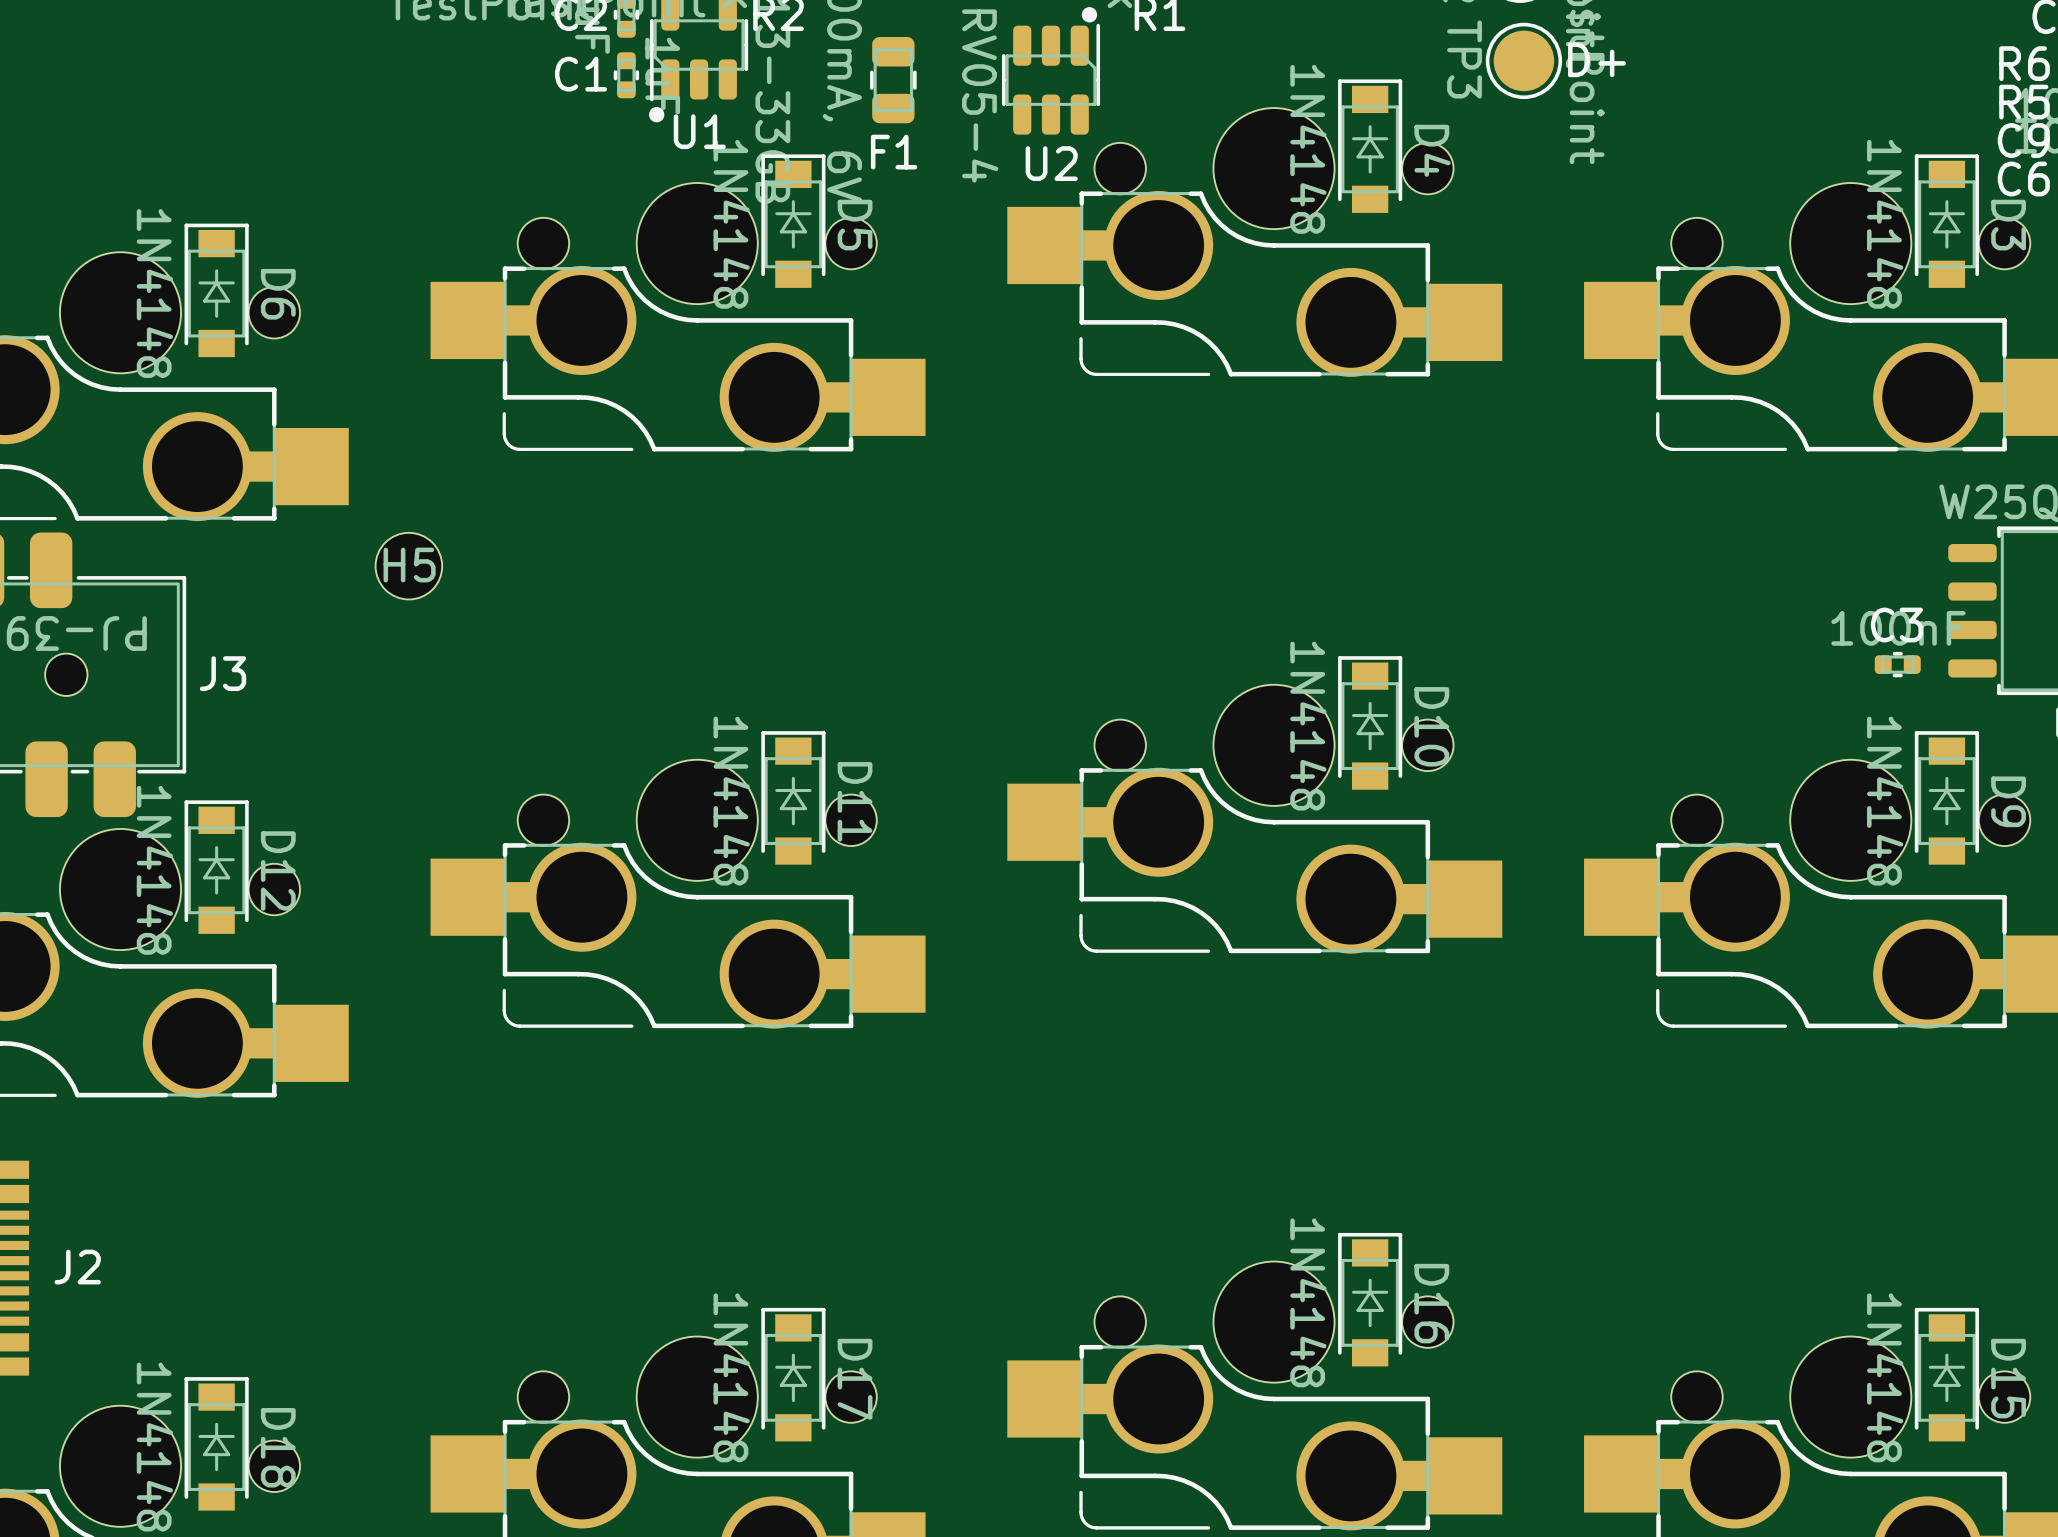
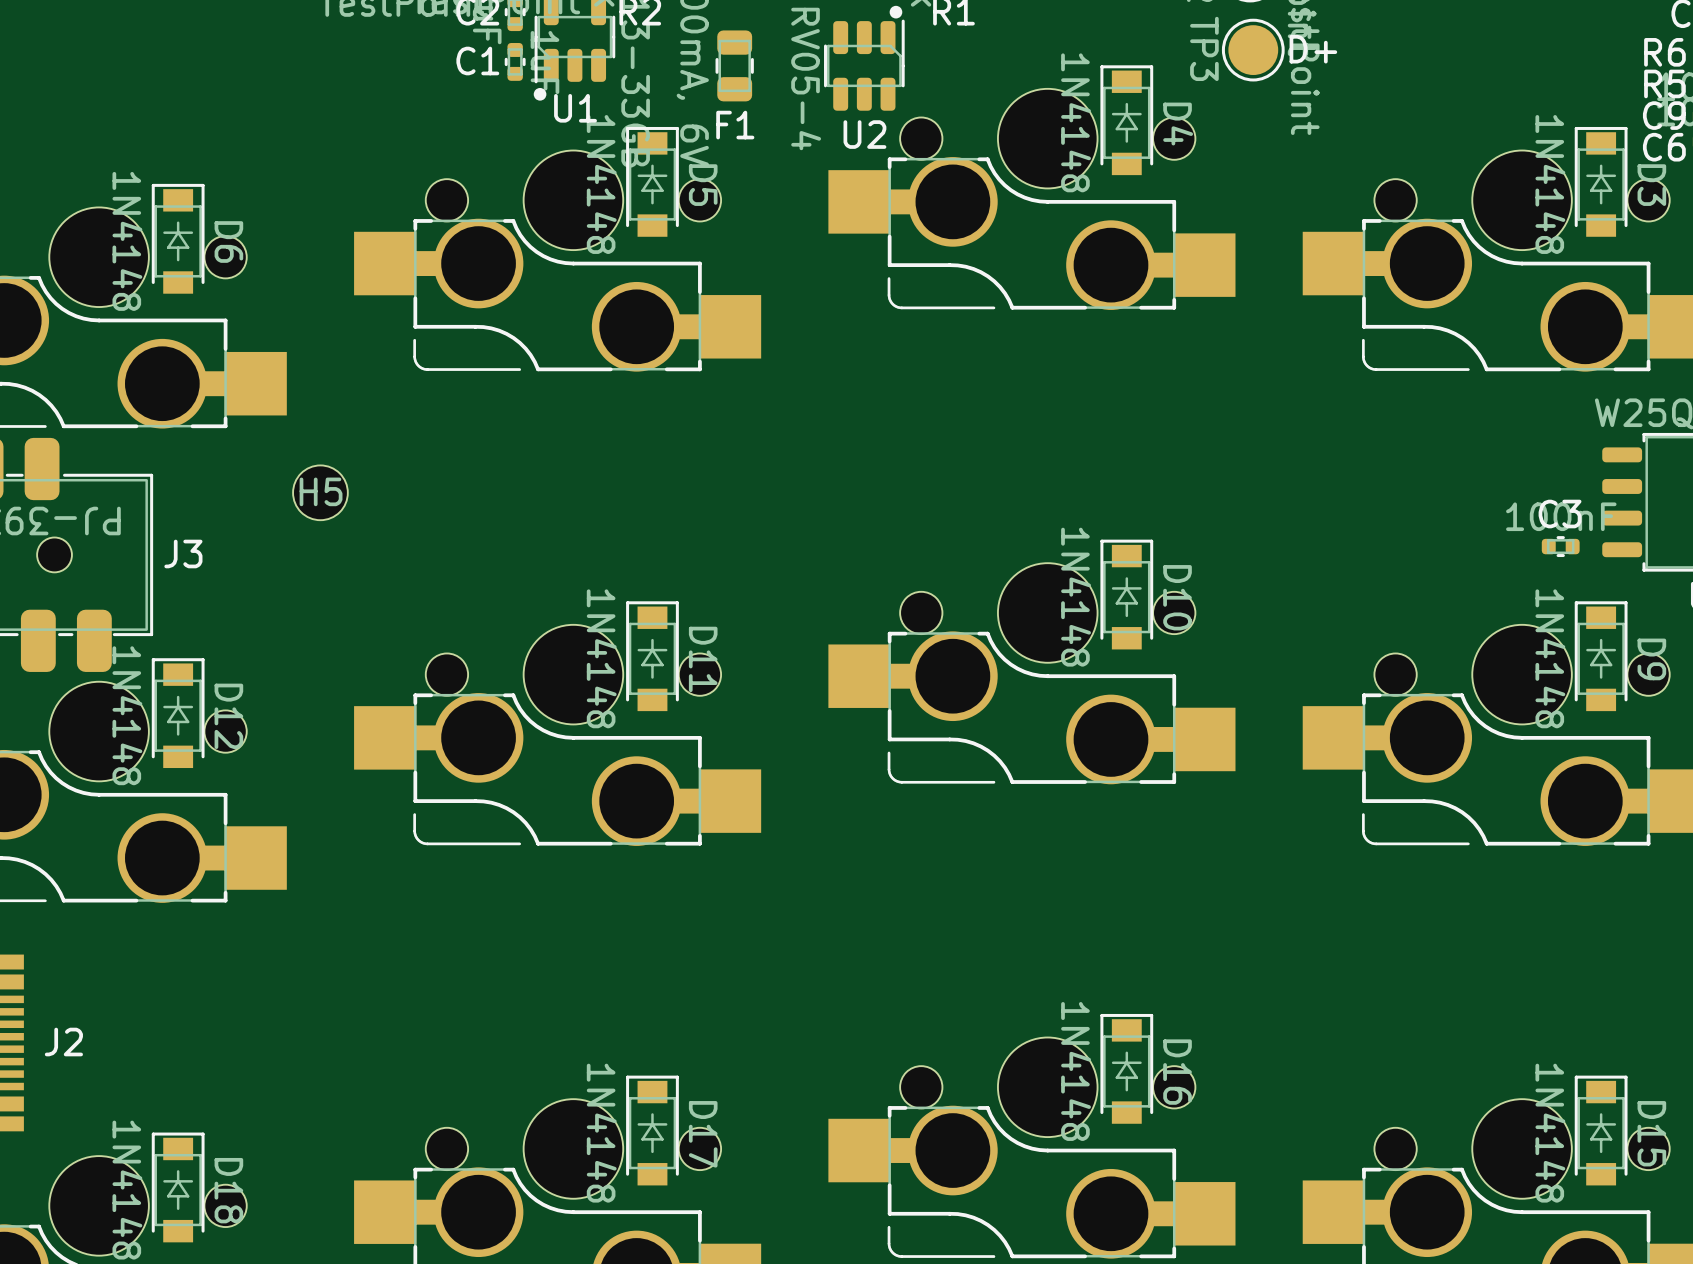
H5 position: (408, 566) -> (320, 492)

